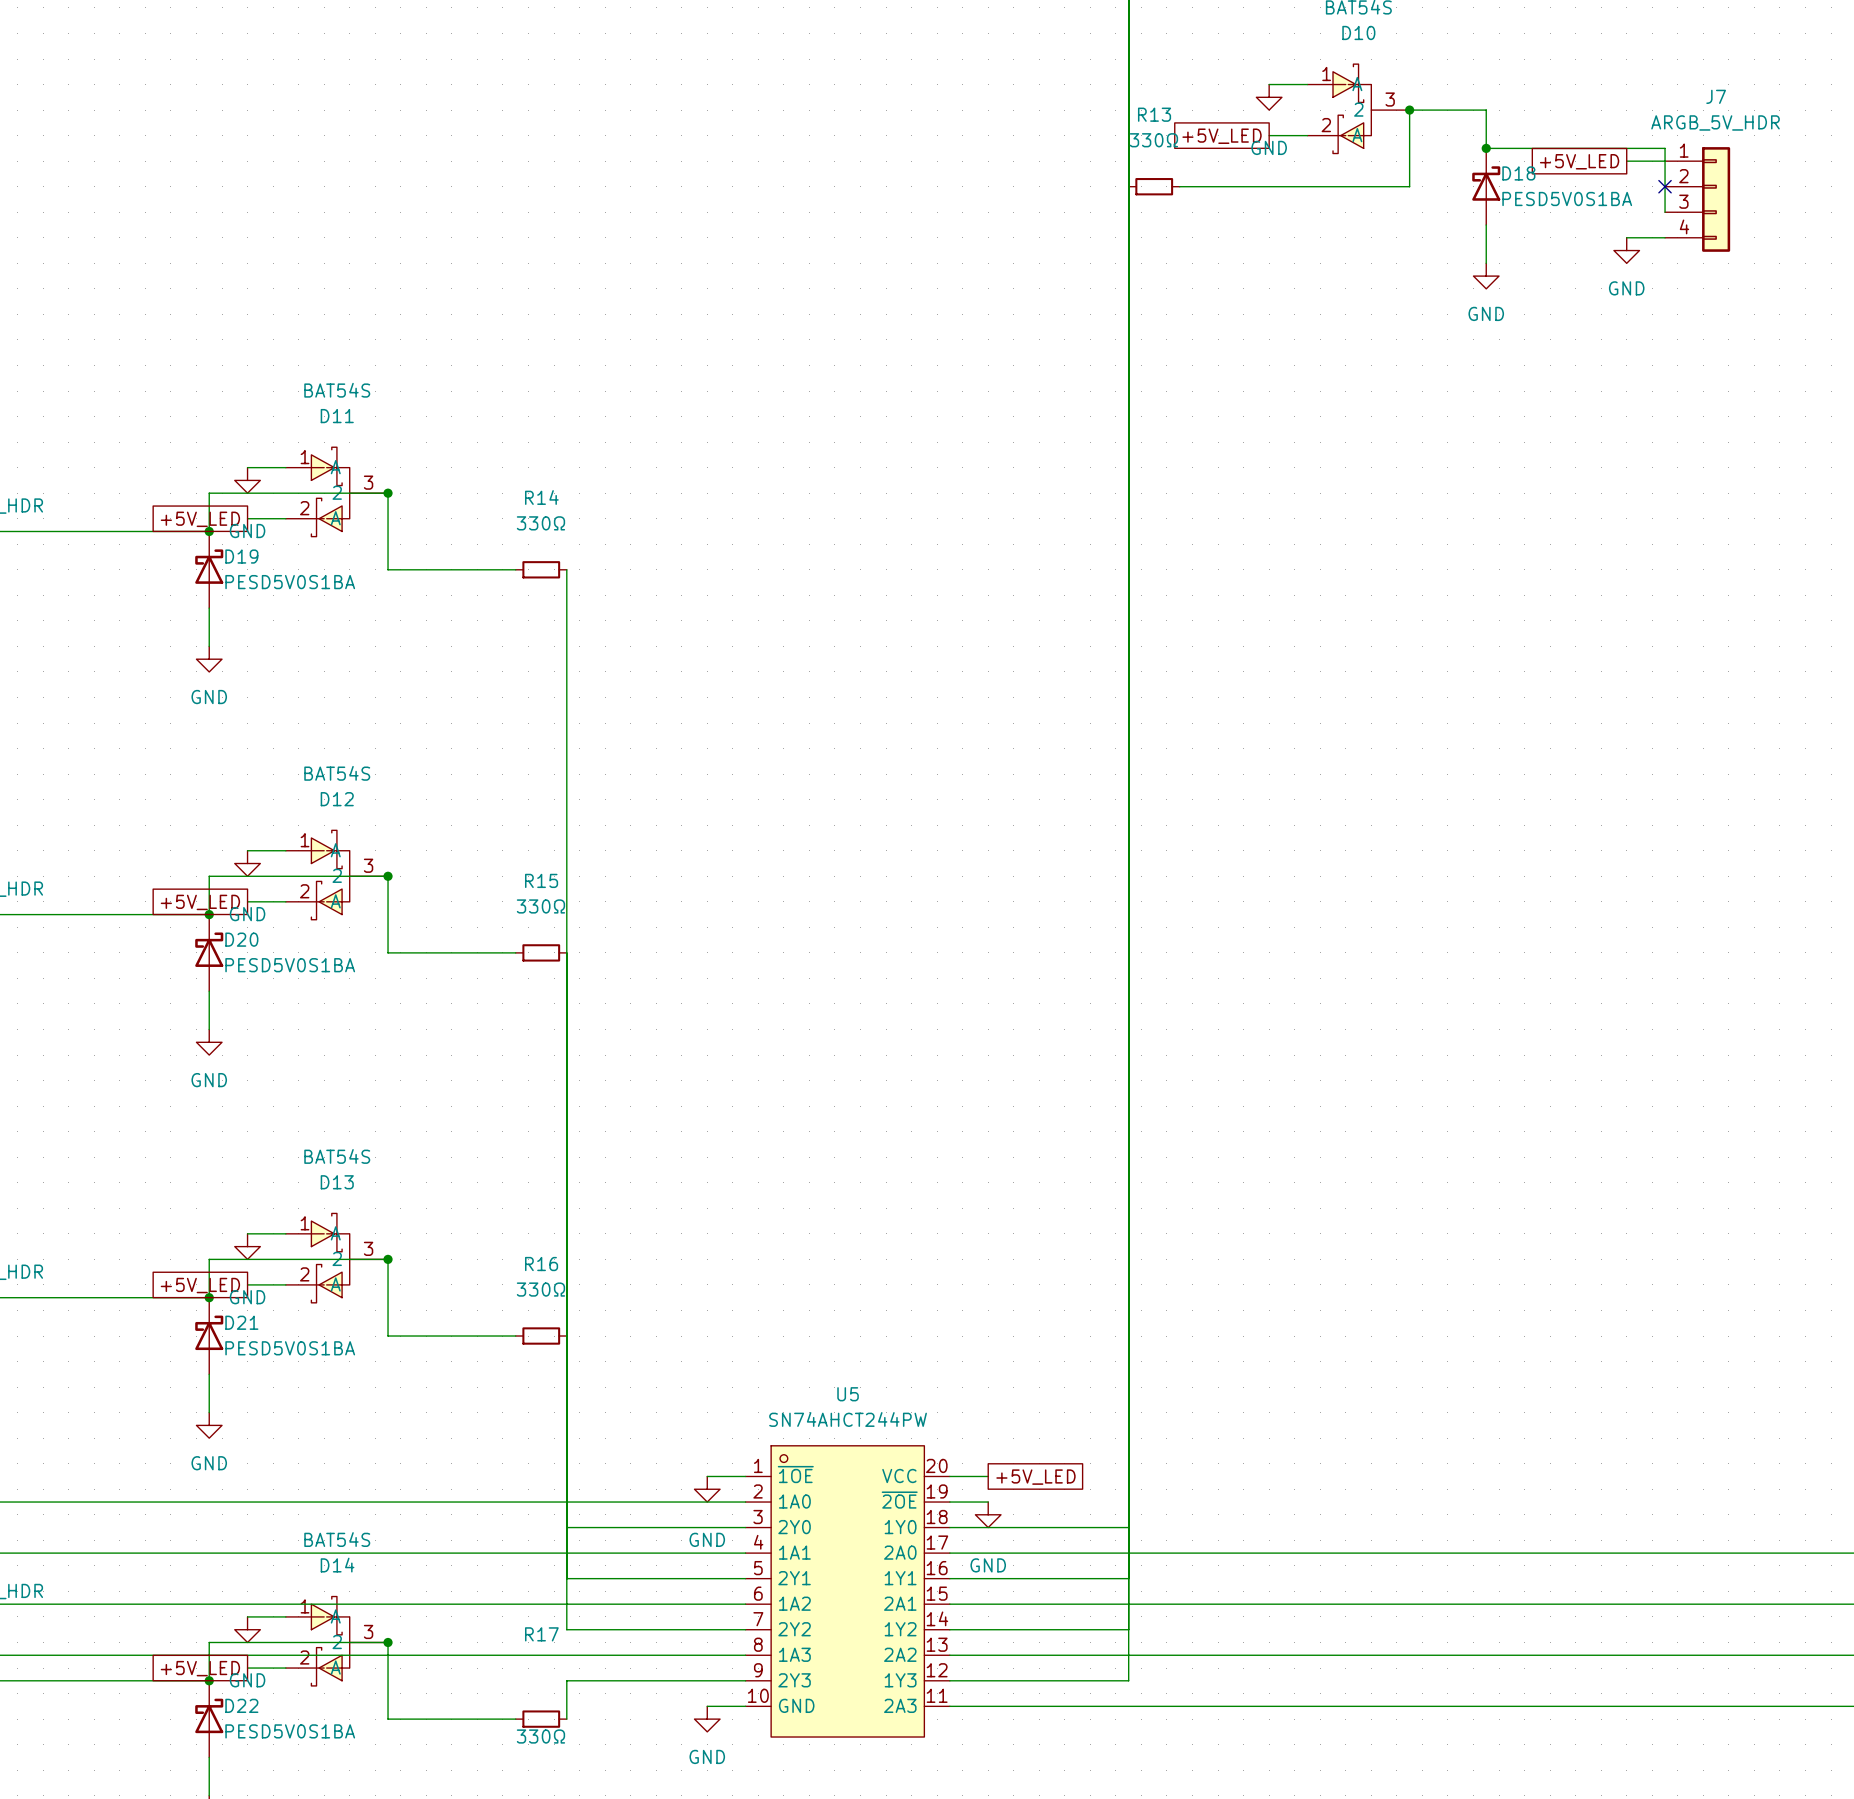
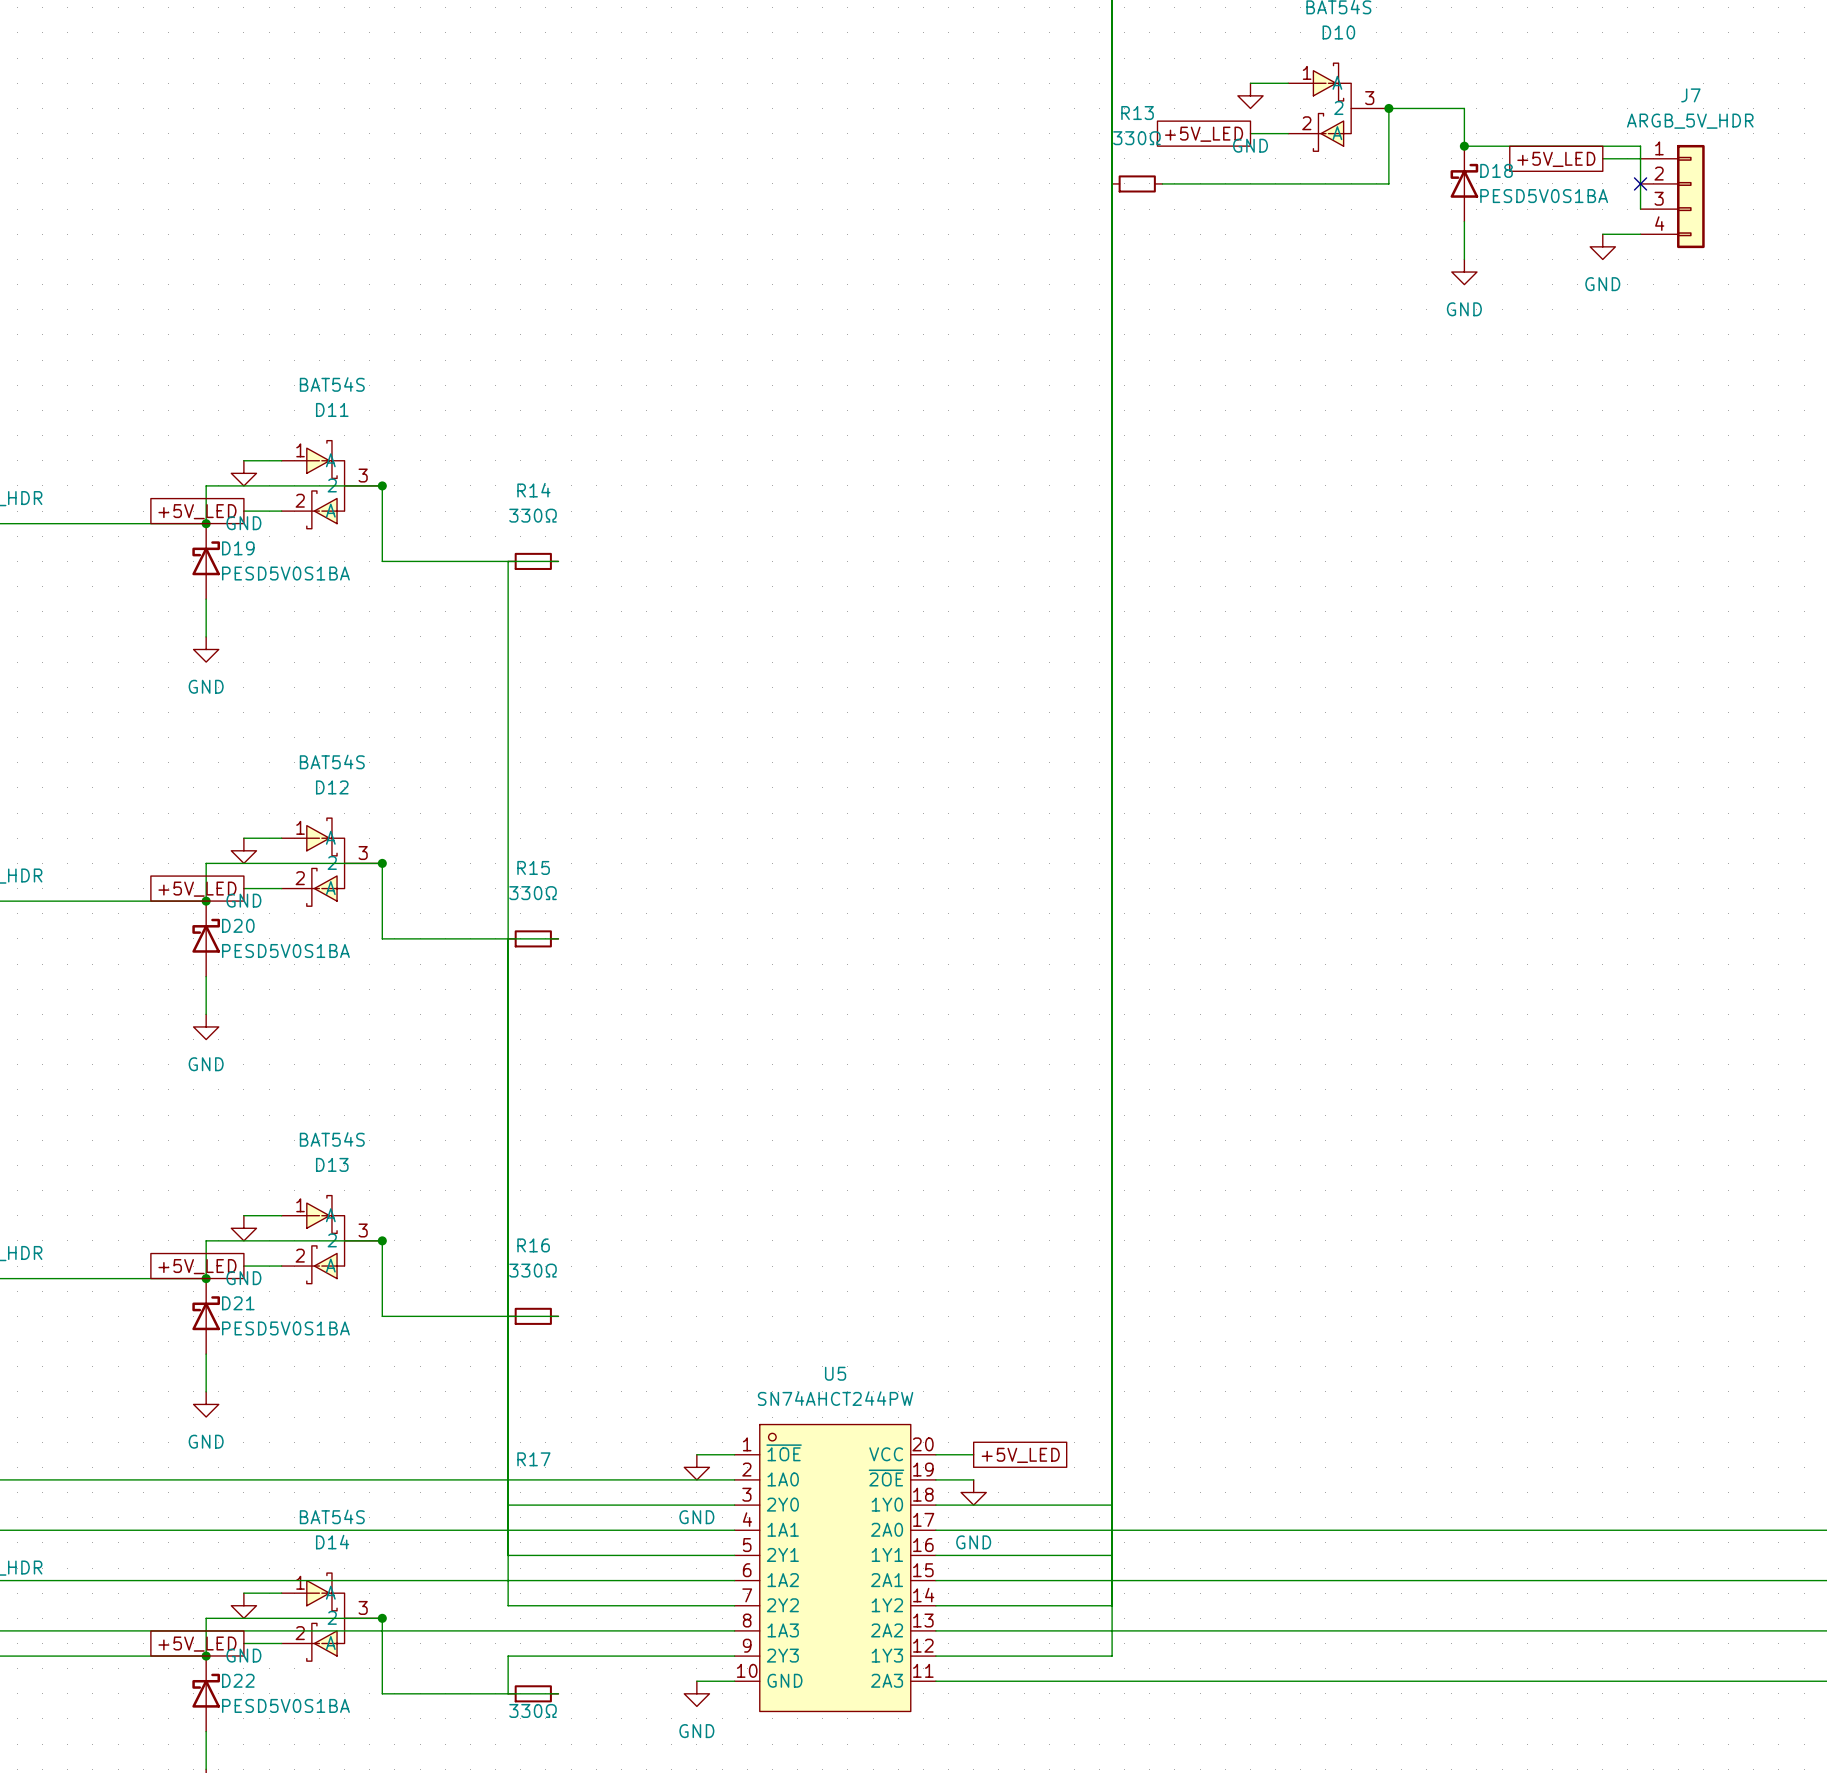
wire: (566, 569) (566, 1629) -> (558, 561) (508, 561) (508, 1605) (558, 1605)
wire: none -> (508, 938) (558, 938)
wire: none -> (508, 1316) (558, 1316)
wire: none -> (508, 1505) (558, 1505)
wire: none -> (508, 1555) (558, 1555)
R17 name position: R17 (541, 1634) -> R17 (533, 1459)
wire: (566, 1680) (566, 1719) -> (558, 1656) (508, 1656) (508, 1693) (558, 1693)

